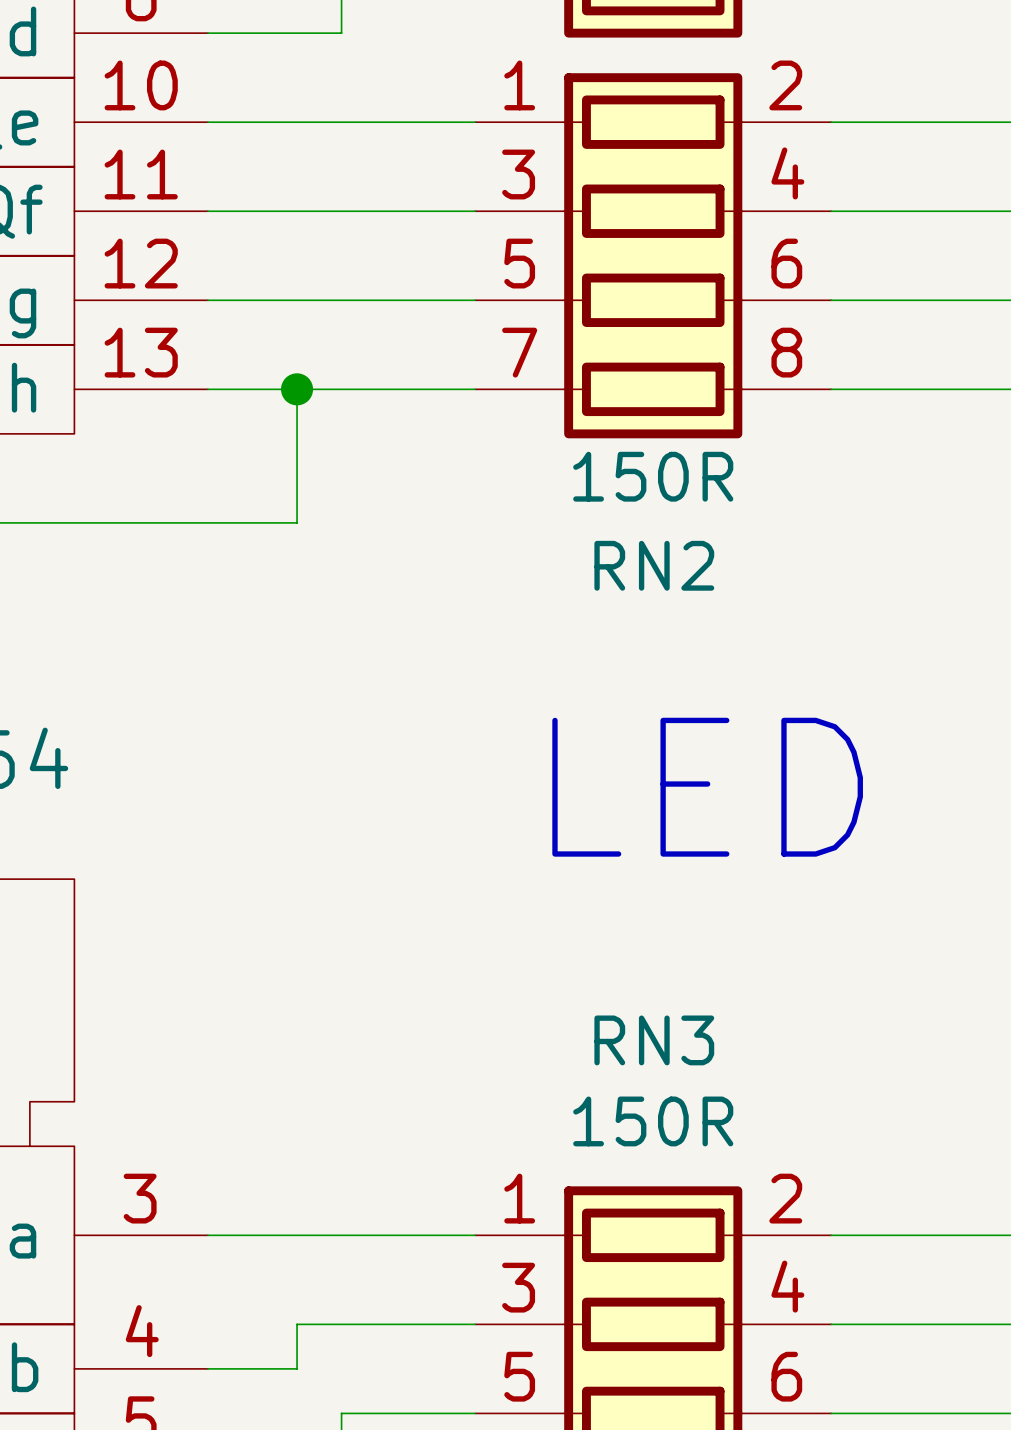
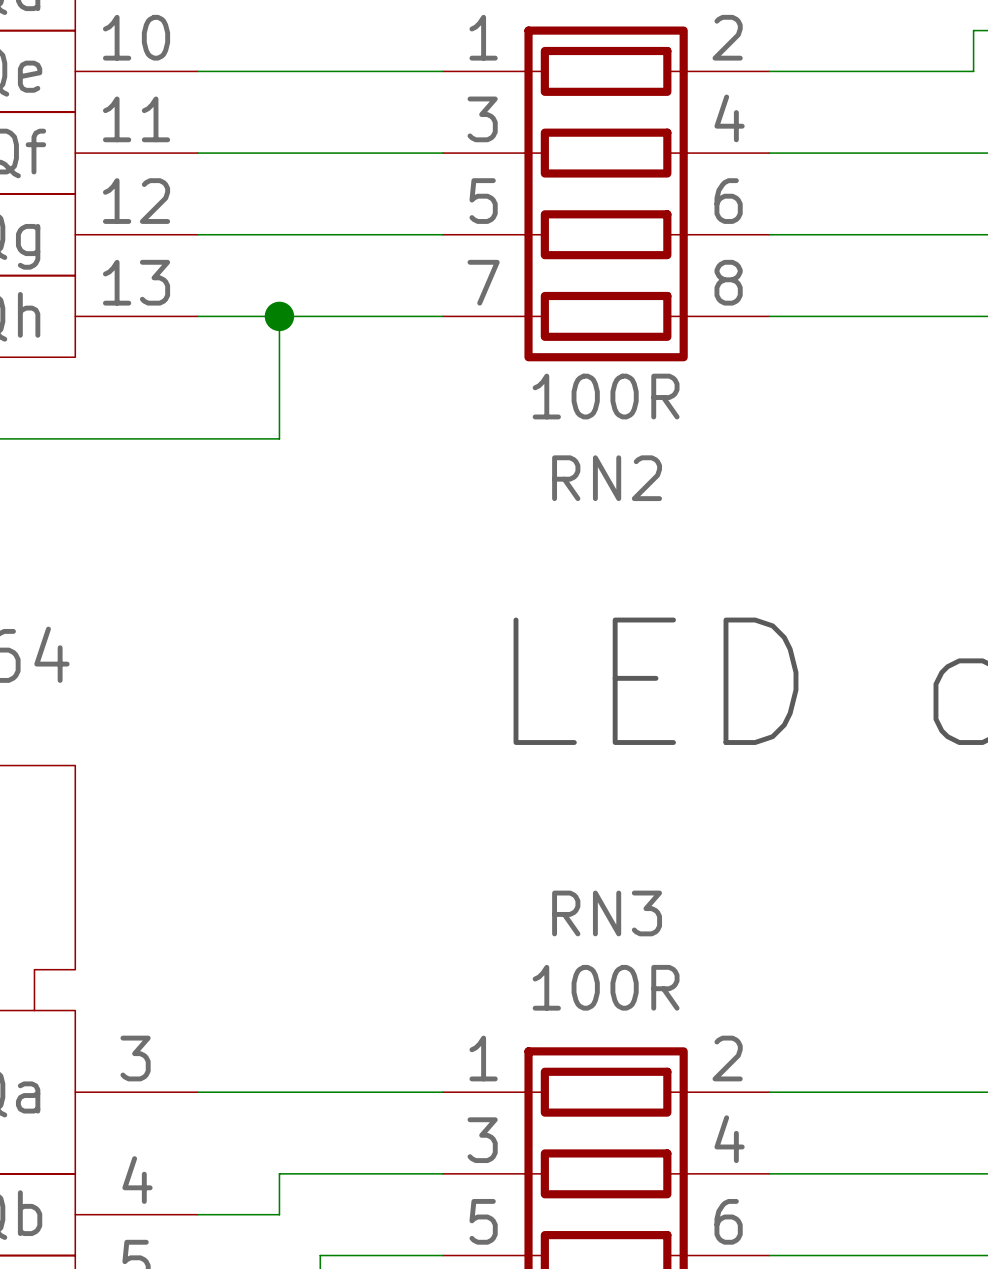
RN2 value: 150R (653, 476) -> 100R (606, 396)
RN3 value: 150R (653, 1121) -> 100R (606, 987)

